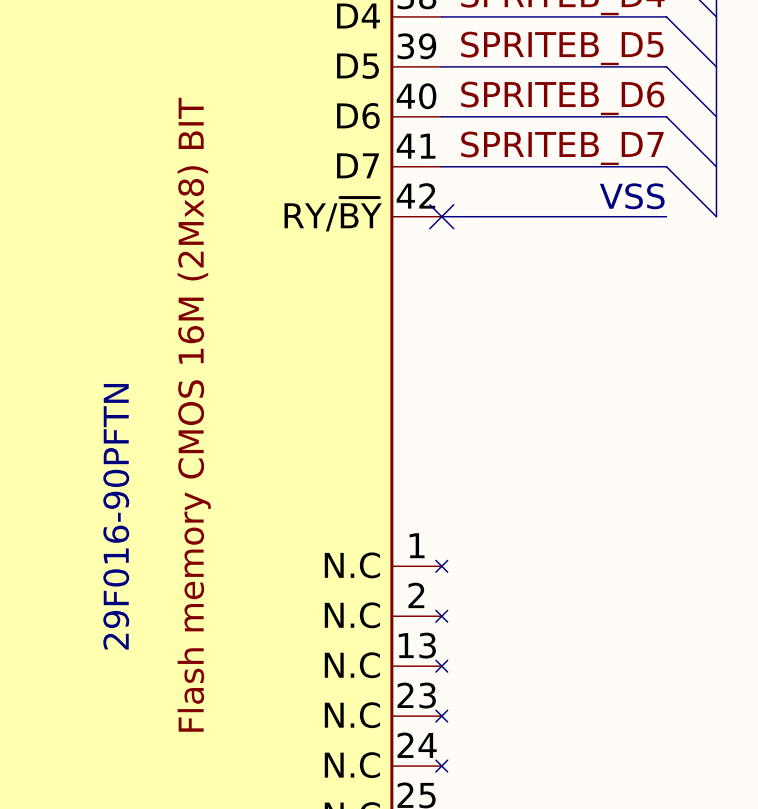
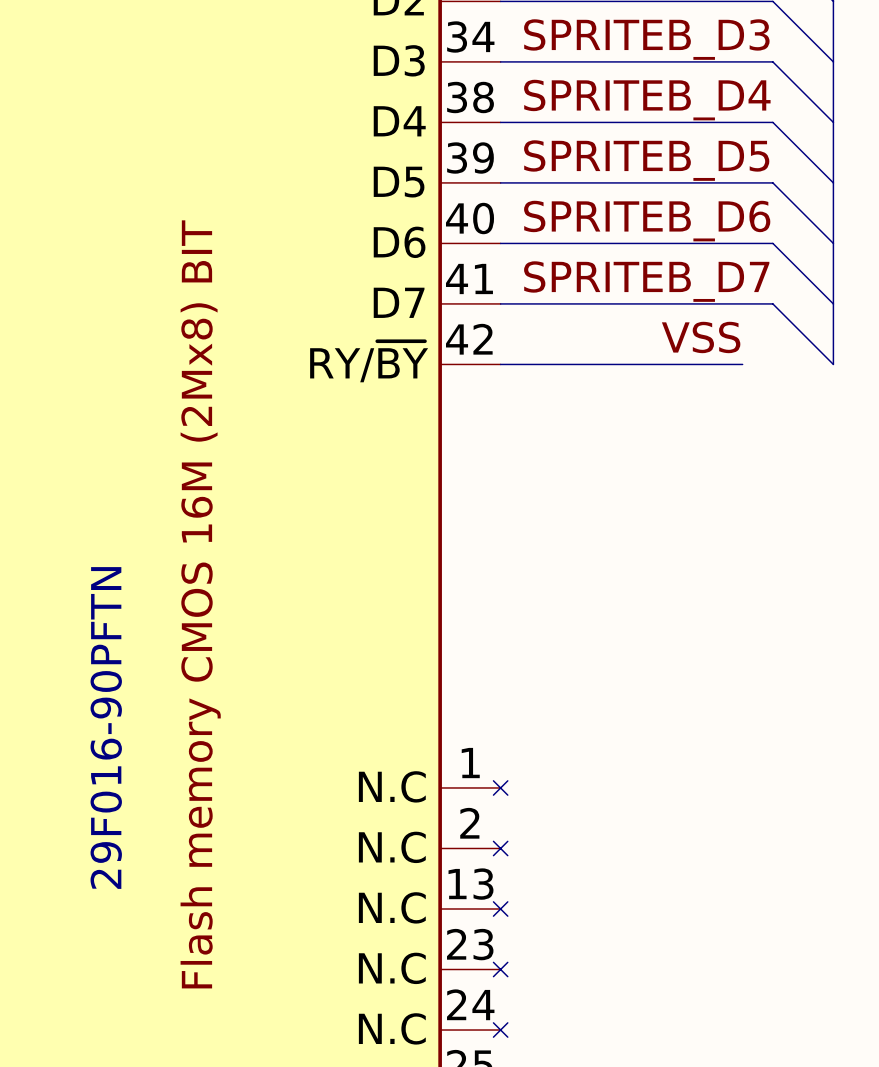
label: none -> VSS (701, 337)
text: VSS (632, 196) -> none
line: (441, 216) (666, 216) -> none
no-connect mark: (441, 216) -> none

